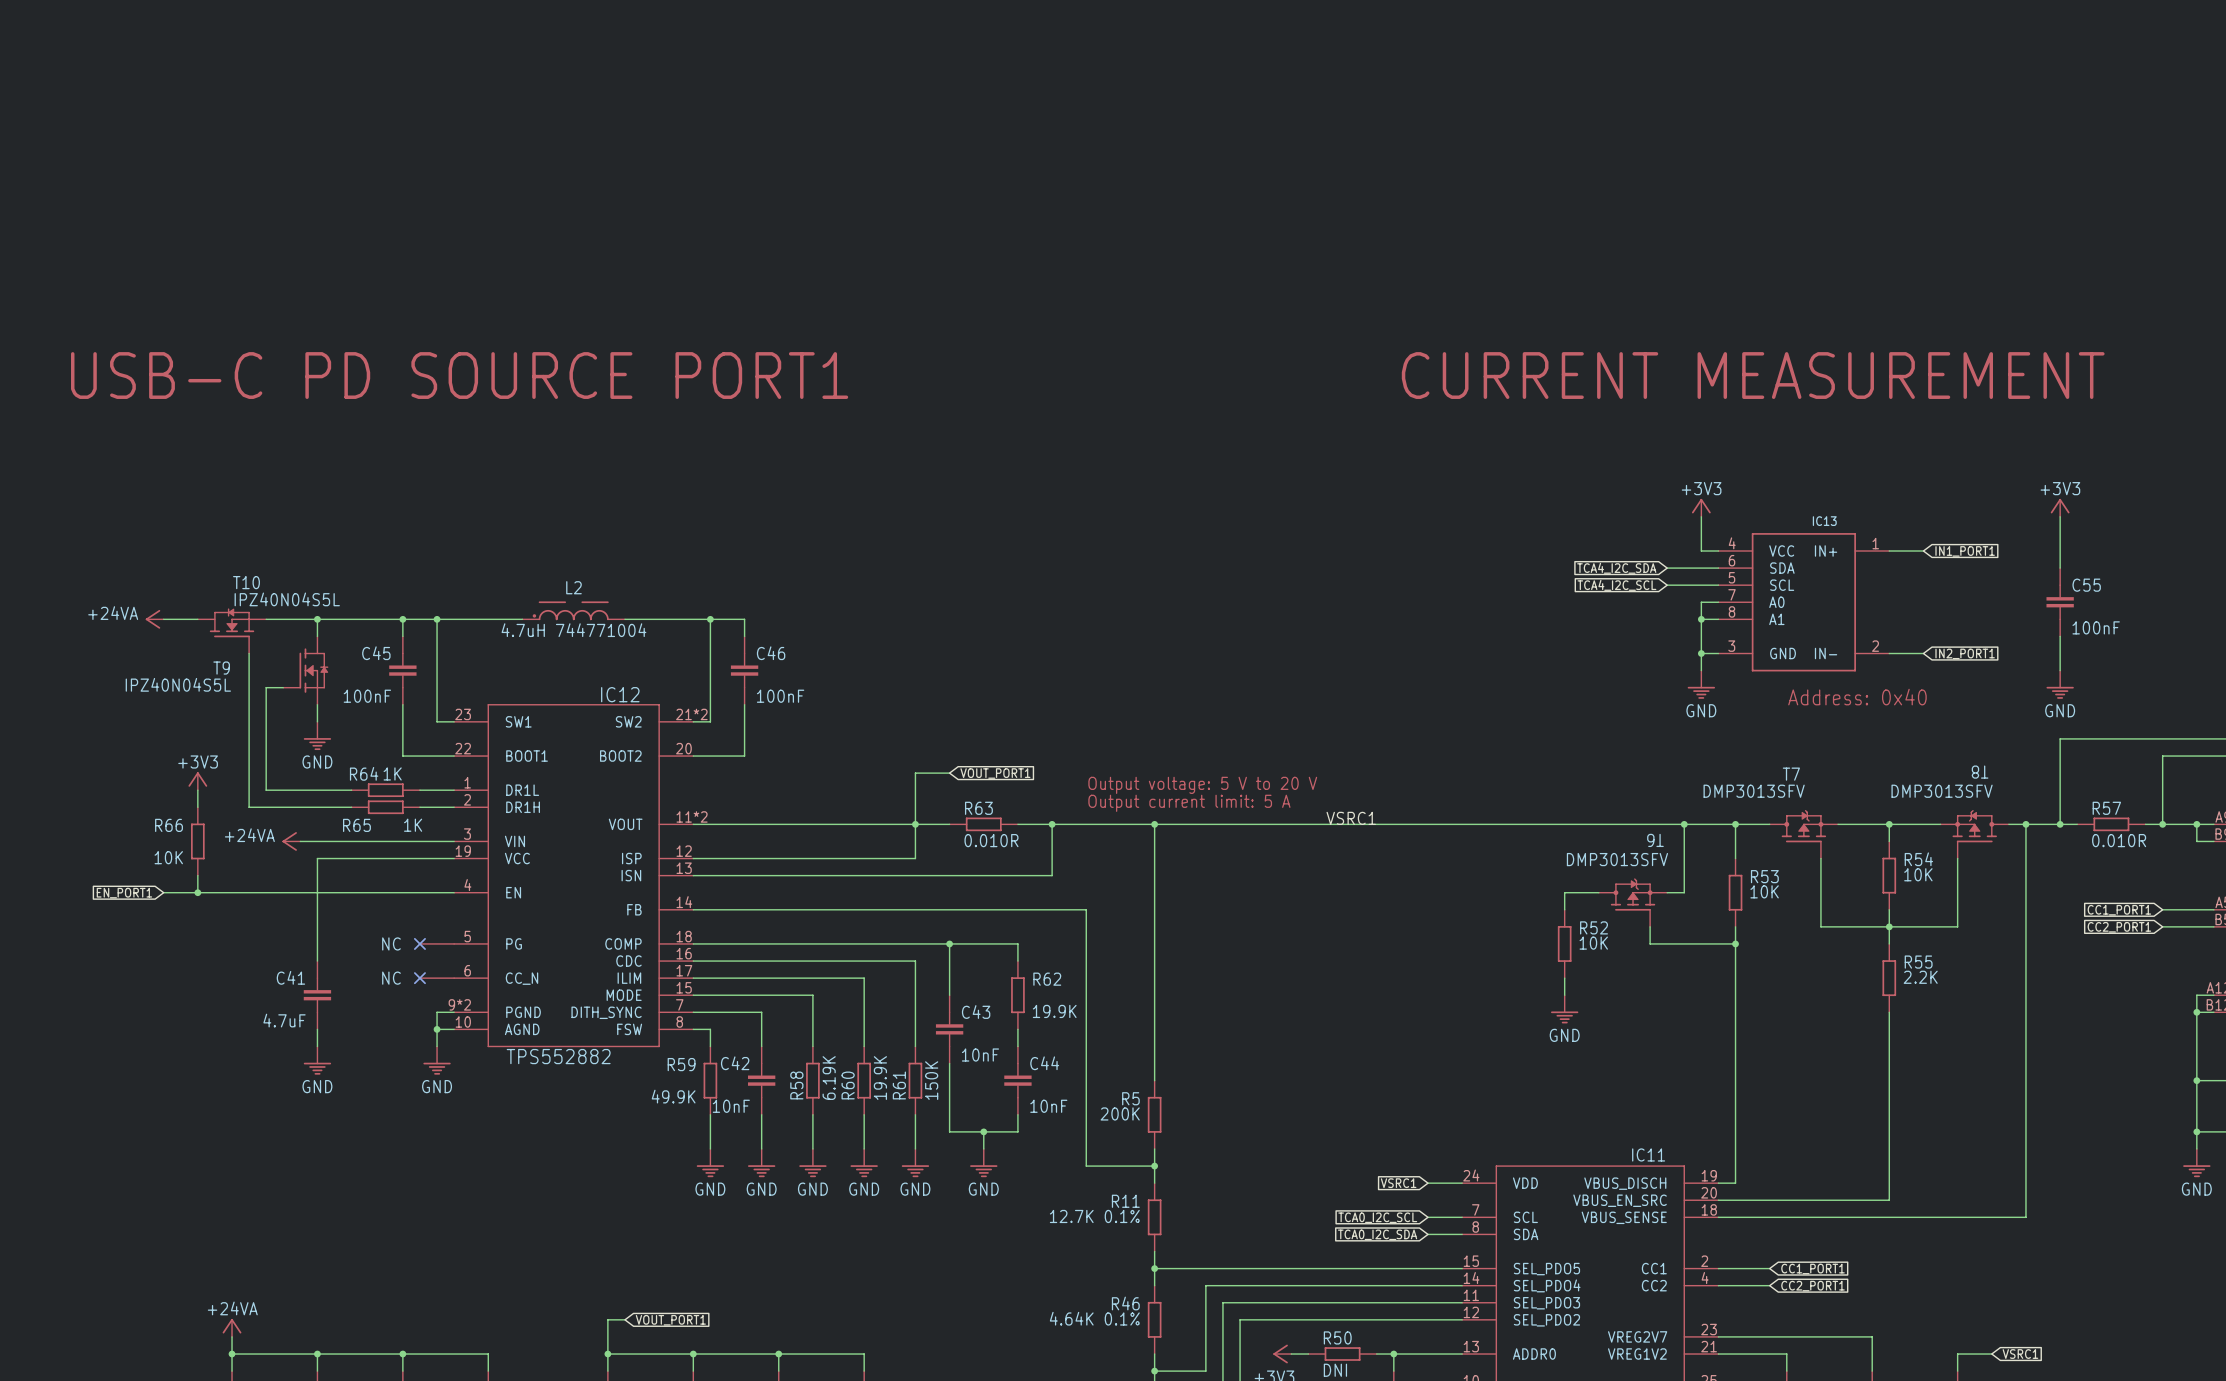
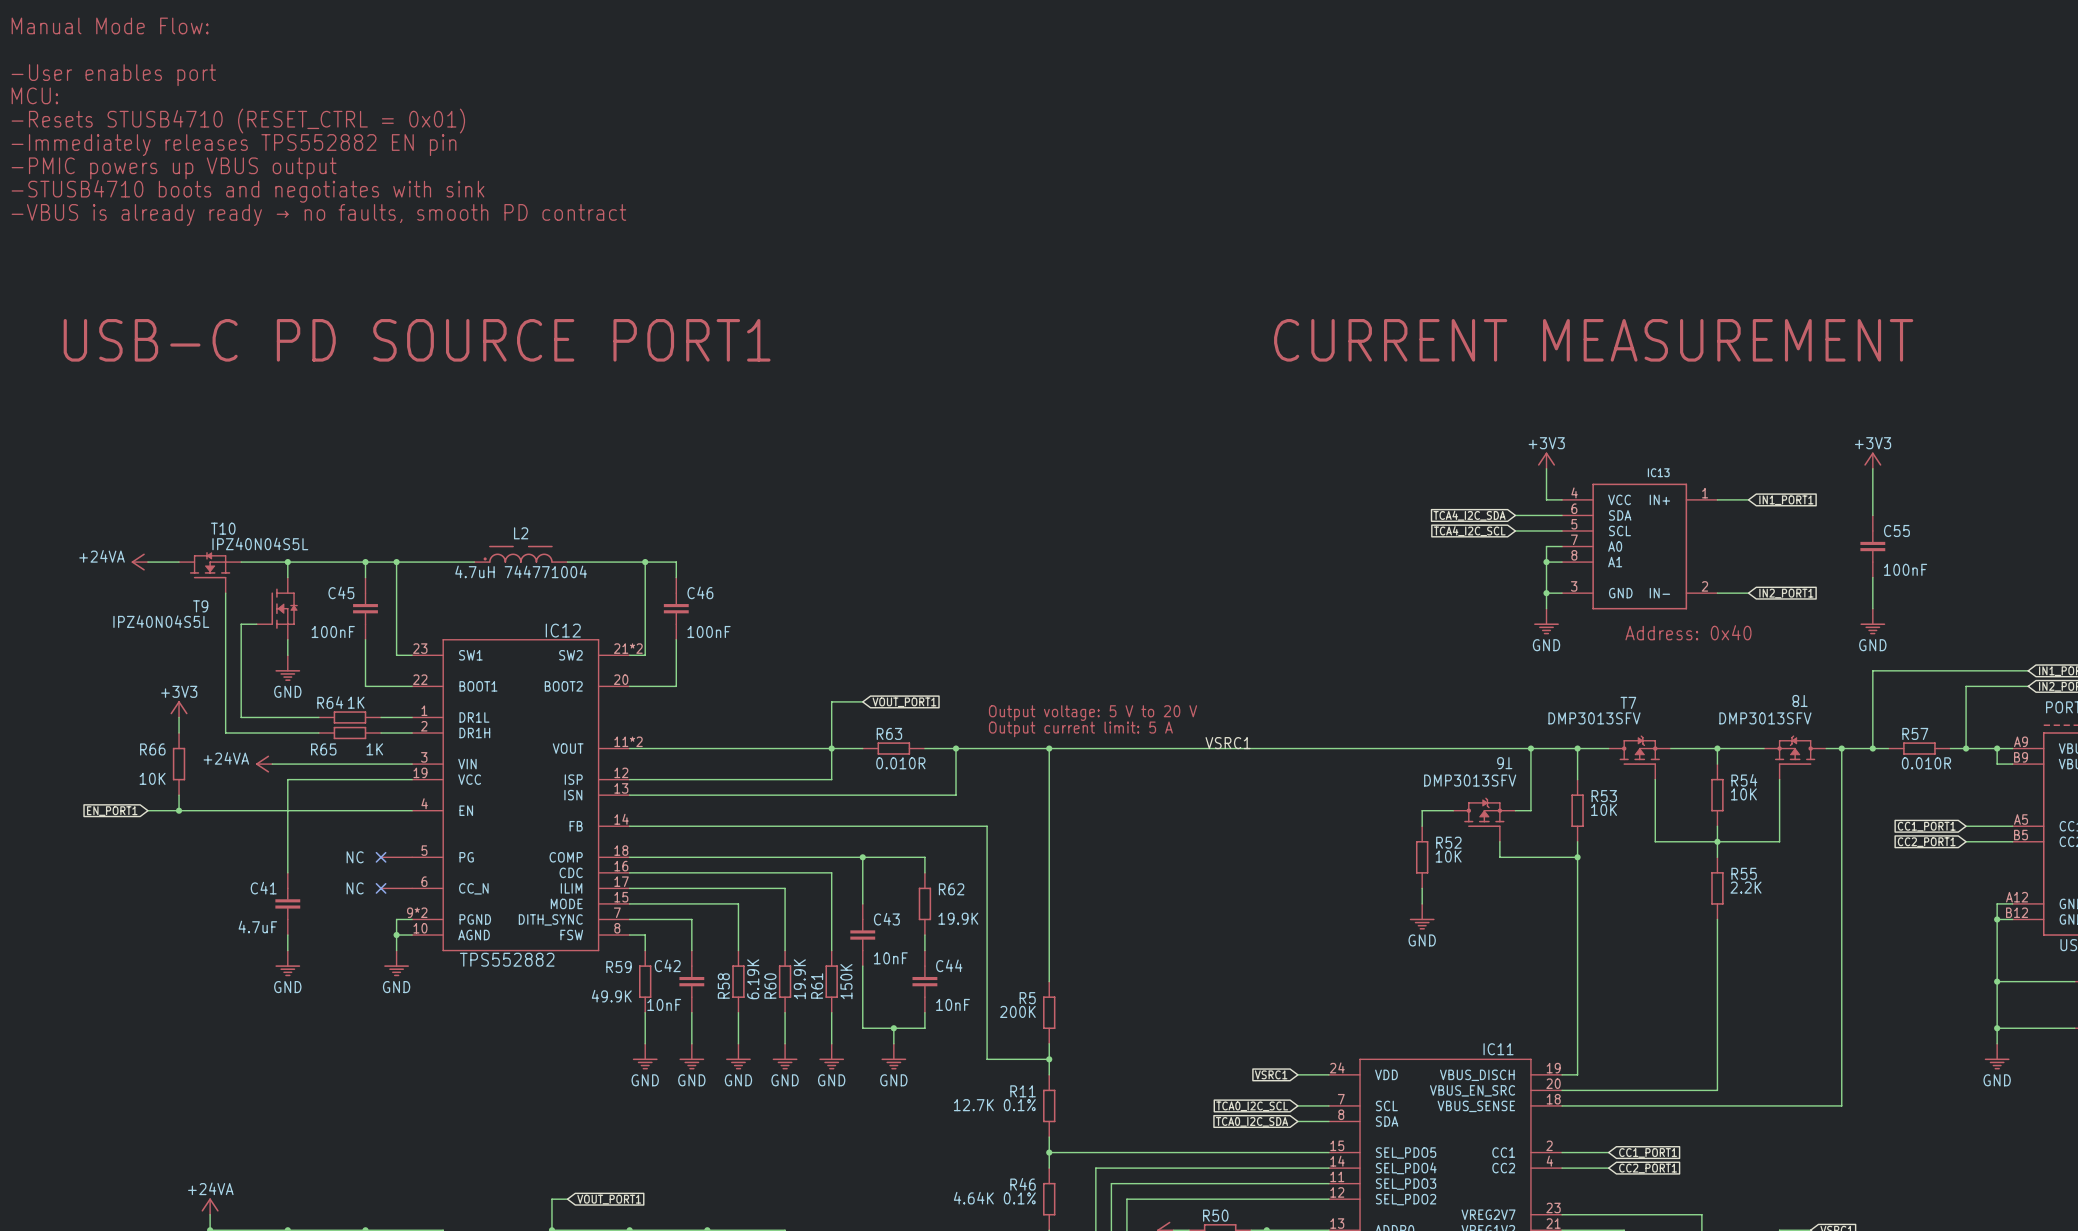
text: none -> Manual Mode Flow: (110, 25)
text: none -> -User enables port (113, 75)
text: none -> MCU: (34, 95)
text: none -> -Resets STUSB4710 (RESET_CTRL = 0x01) (238, 121)
text: none -> -Immediately releases TPS552882 EN pin (234, 145)
text: none -> -PMIC powers up VBUS output (174, 168)
text: none -> -STUSB4710 boots and negotiates with sink (248, 191)
text: none -> -VBUS is already ready → no faults, smooth PD contract (318, 215)

